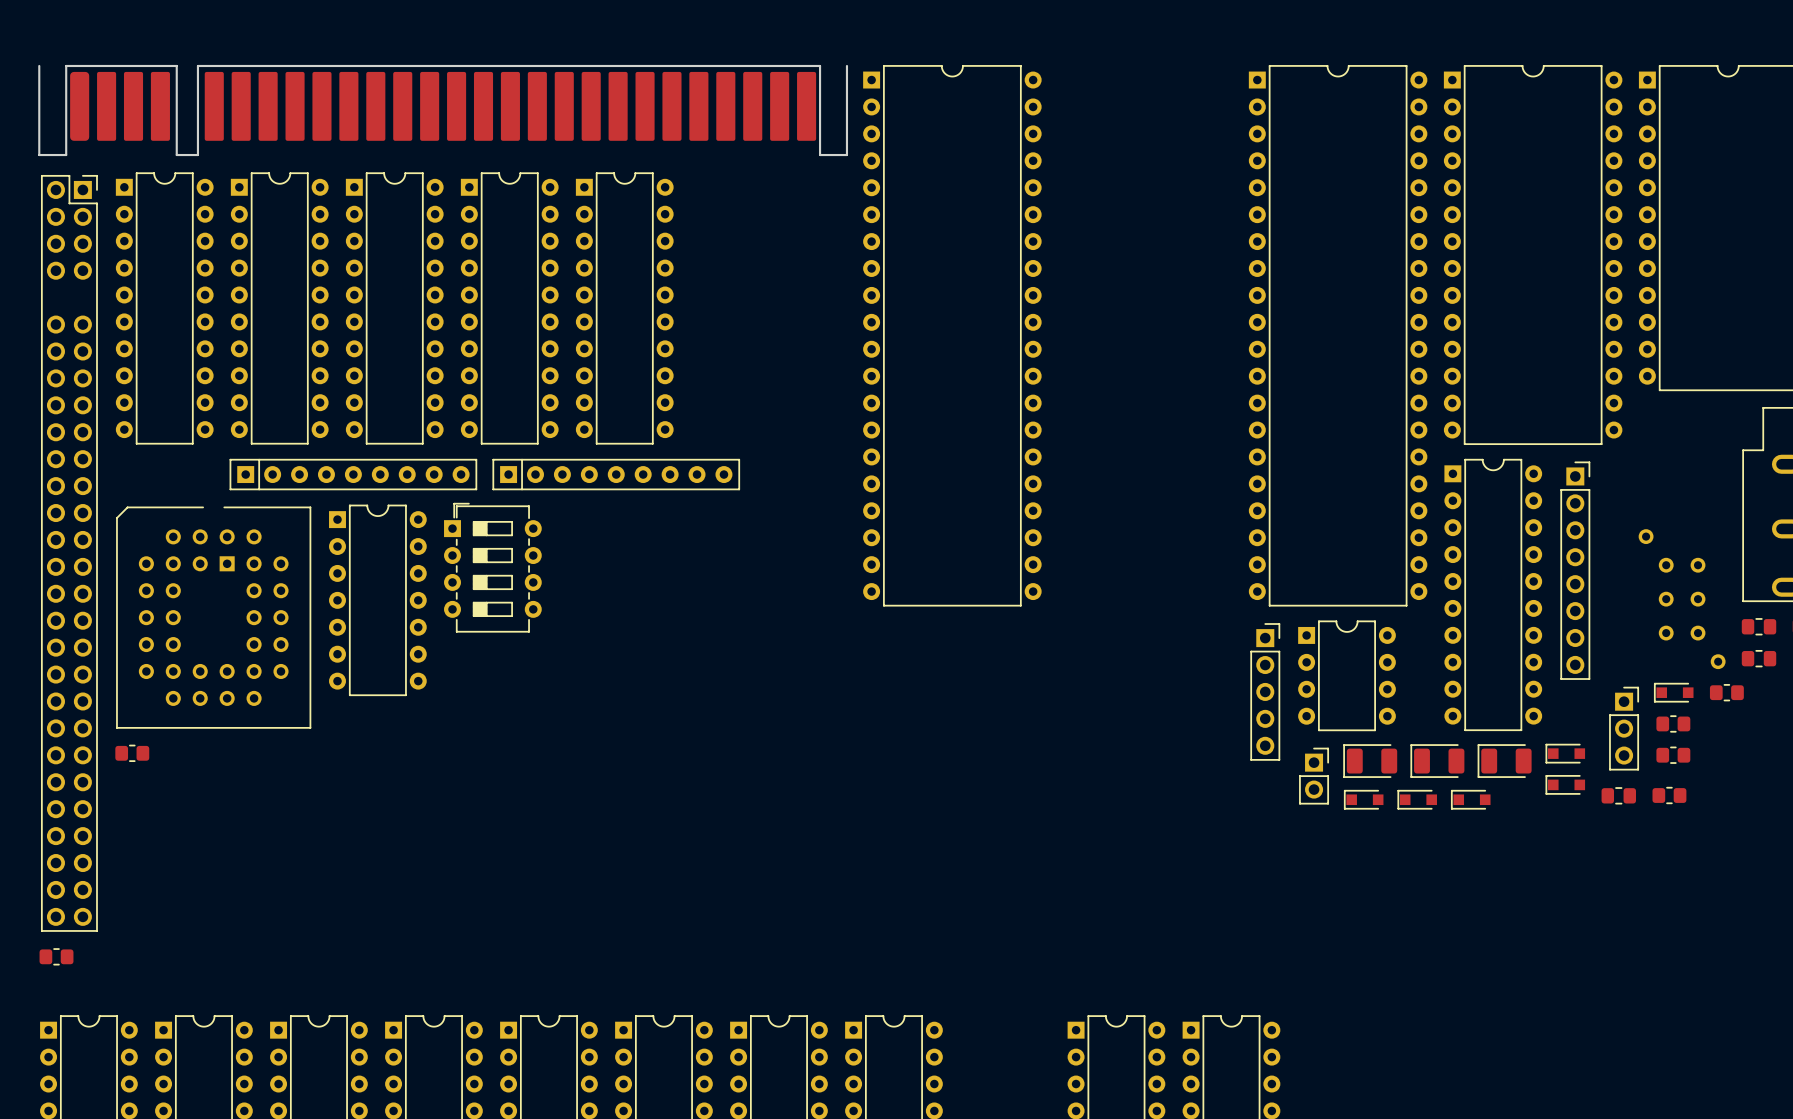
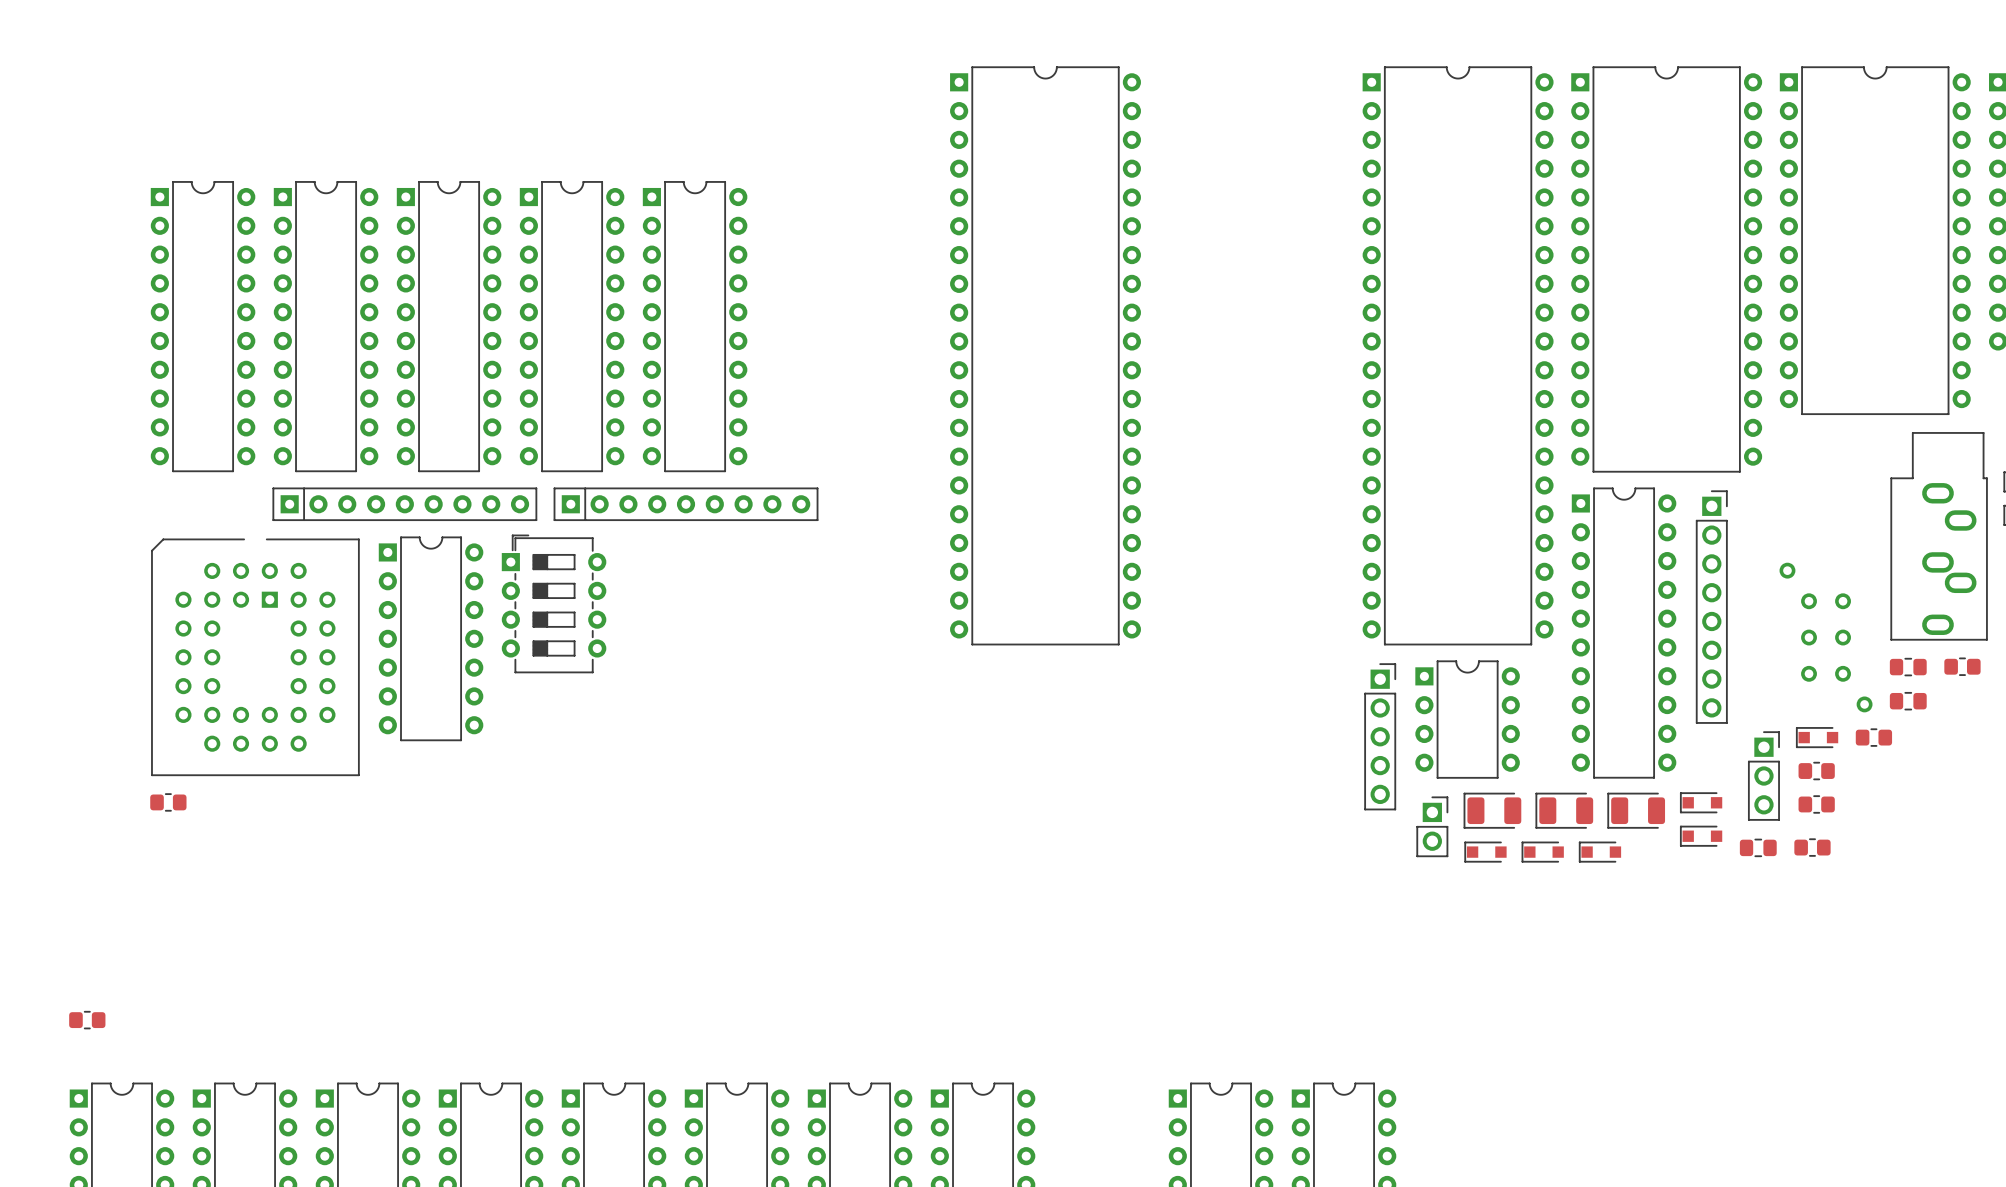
part: (443, 110) -> none
part: (69, 553) -> none

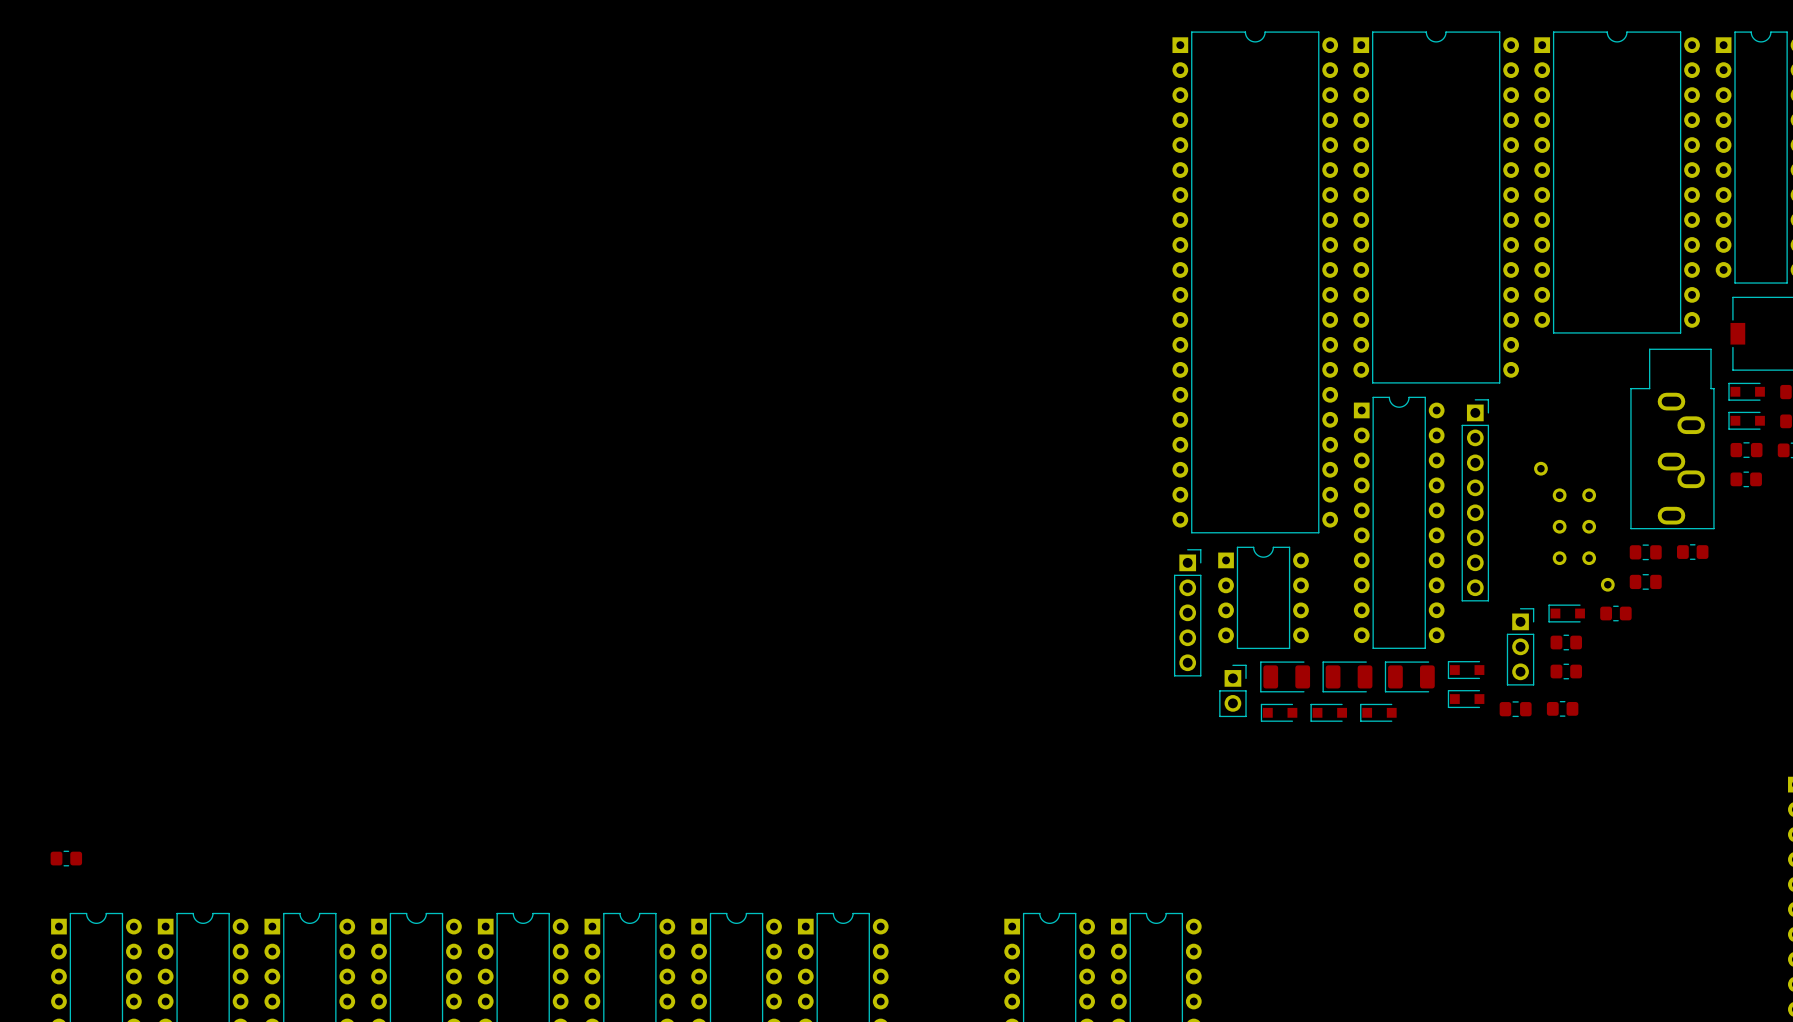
part: (203, 326) -> none
part: (326, 326) -> none
part: (449, 326) -> none
part: (572, 326) -> none
part: (695, 326) -> none
part: (1045, 355) -> none
part: (404, 504) -> none
part: (686, 504) -> none
part: (554, 603) -> none
part: (431, 638) -> none
part: (255, 657) -> none
part: (168, 802) -> none

